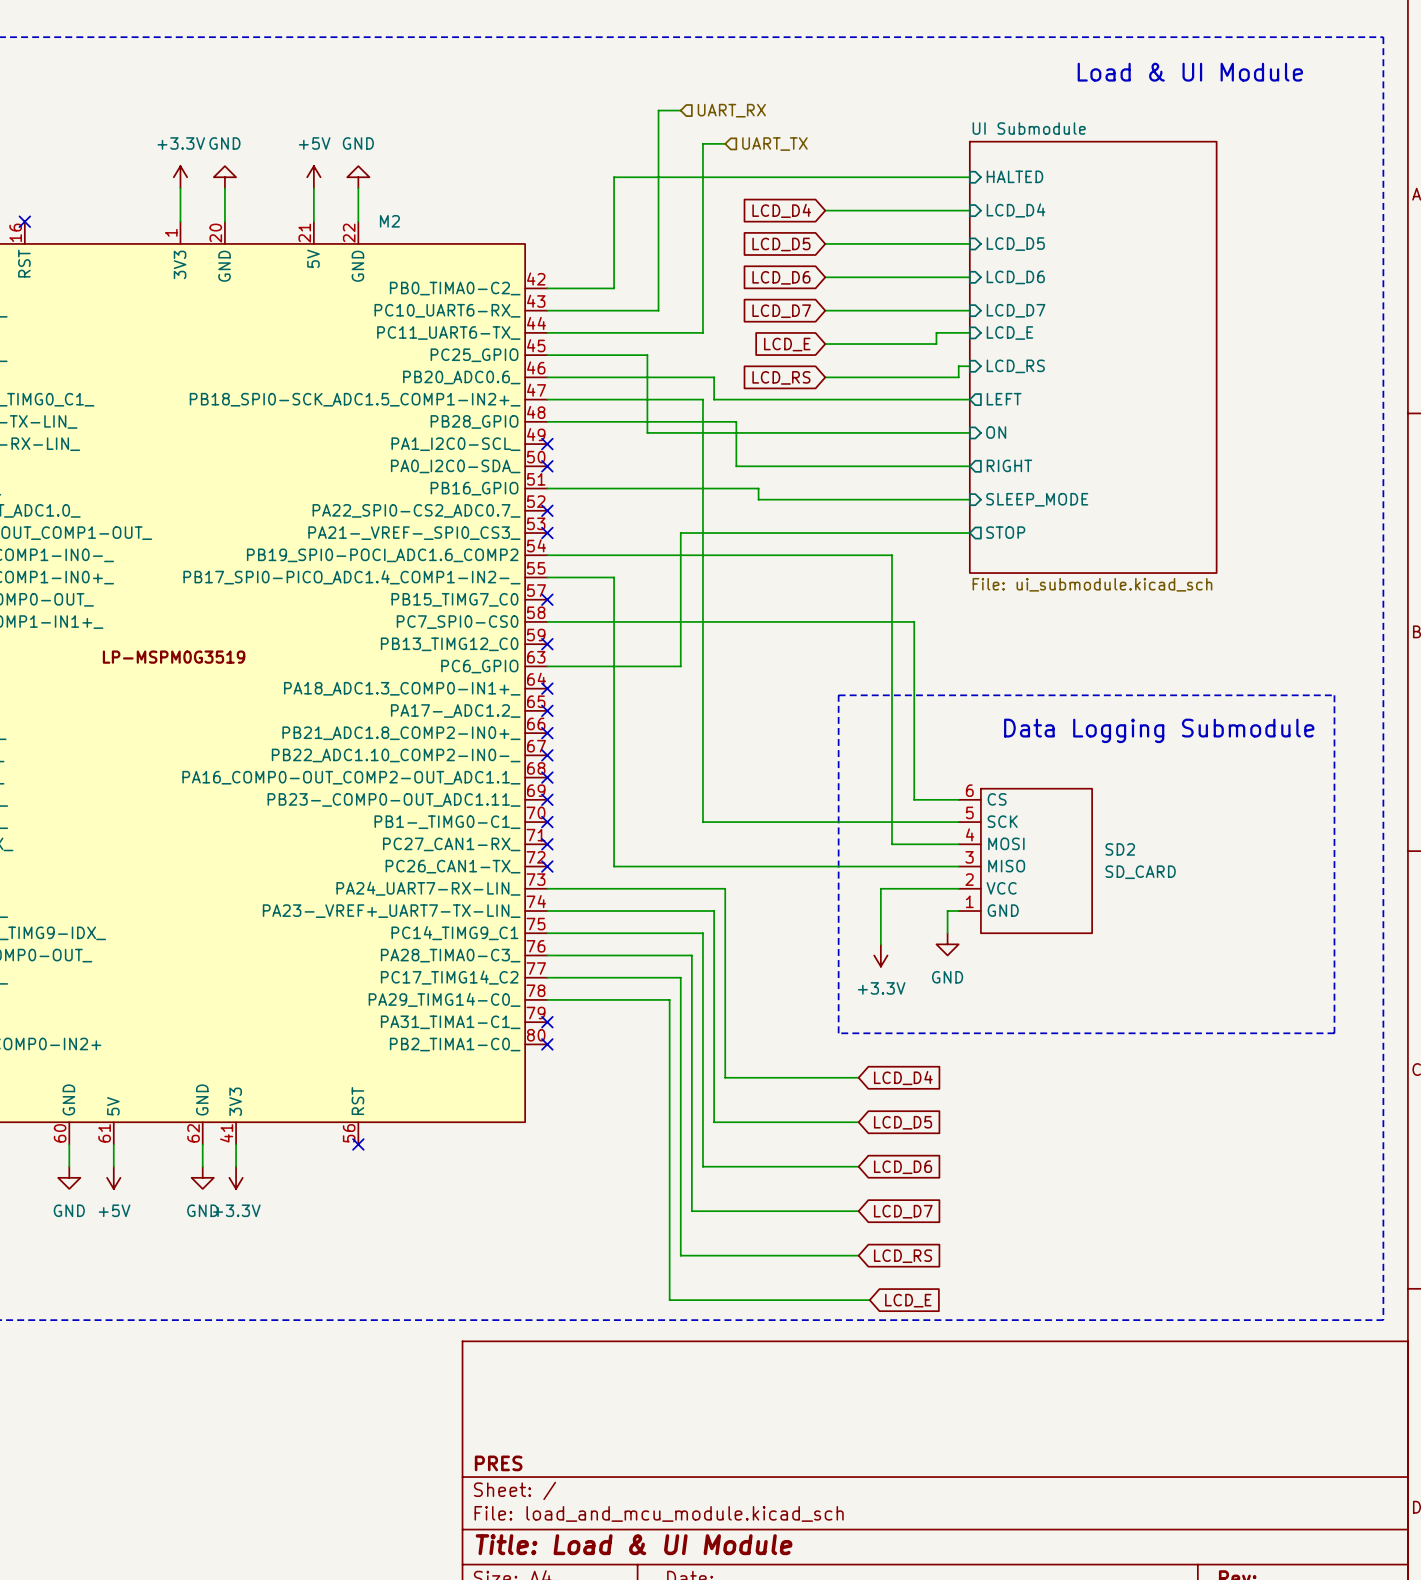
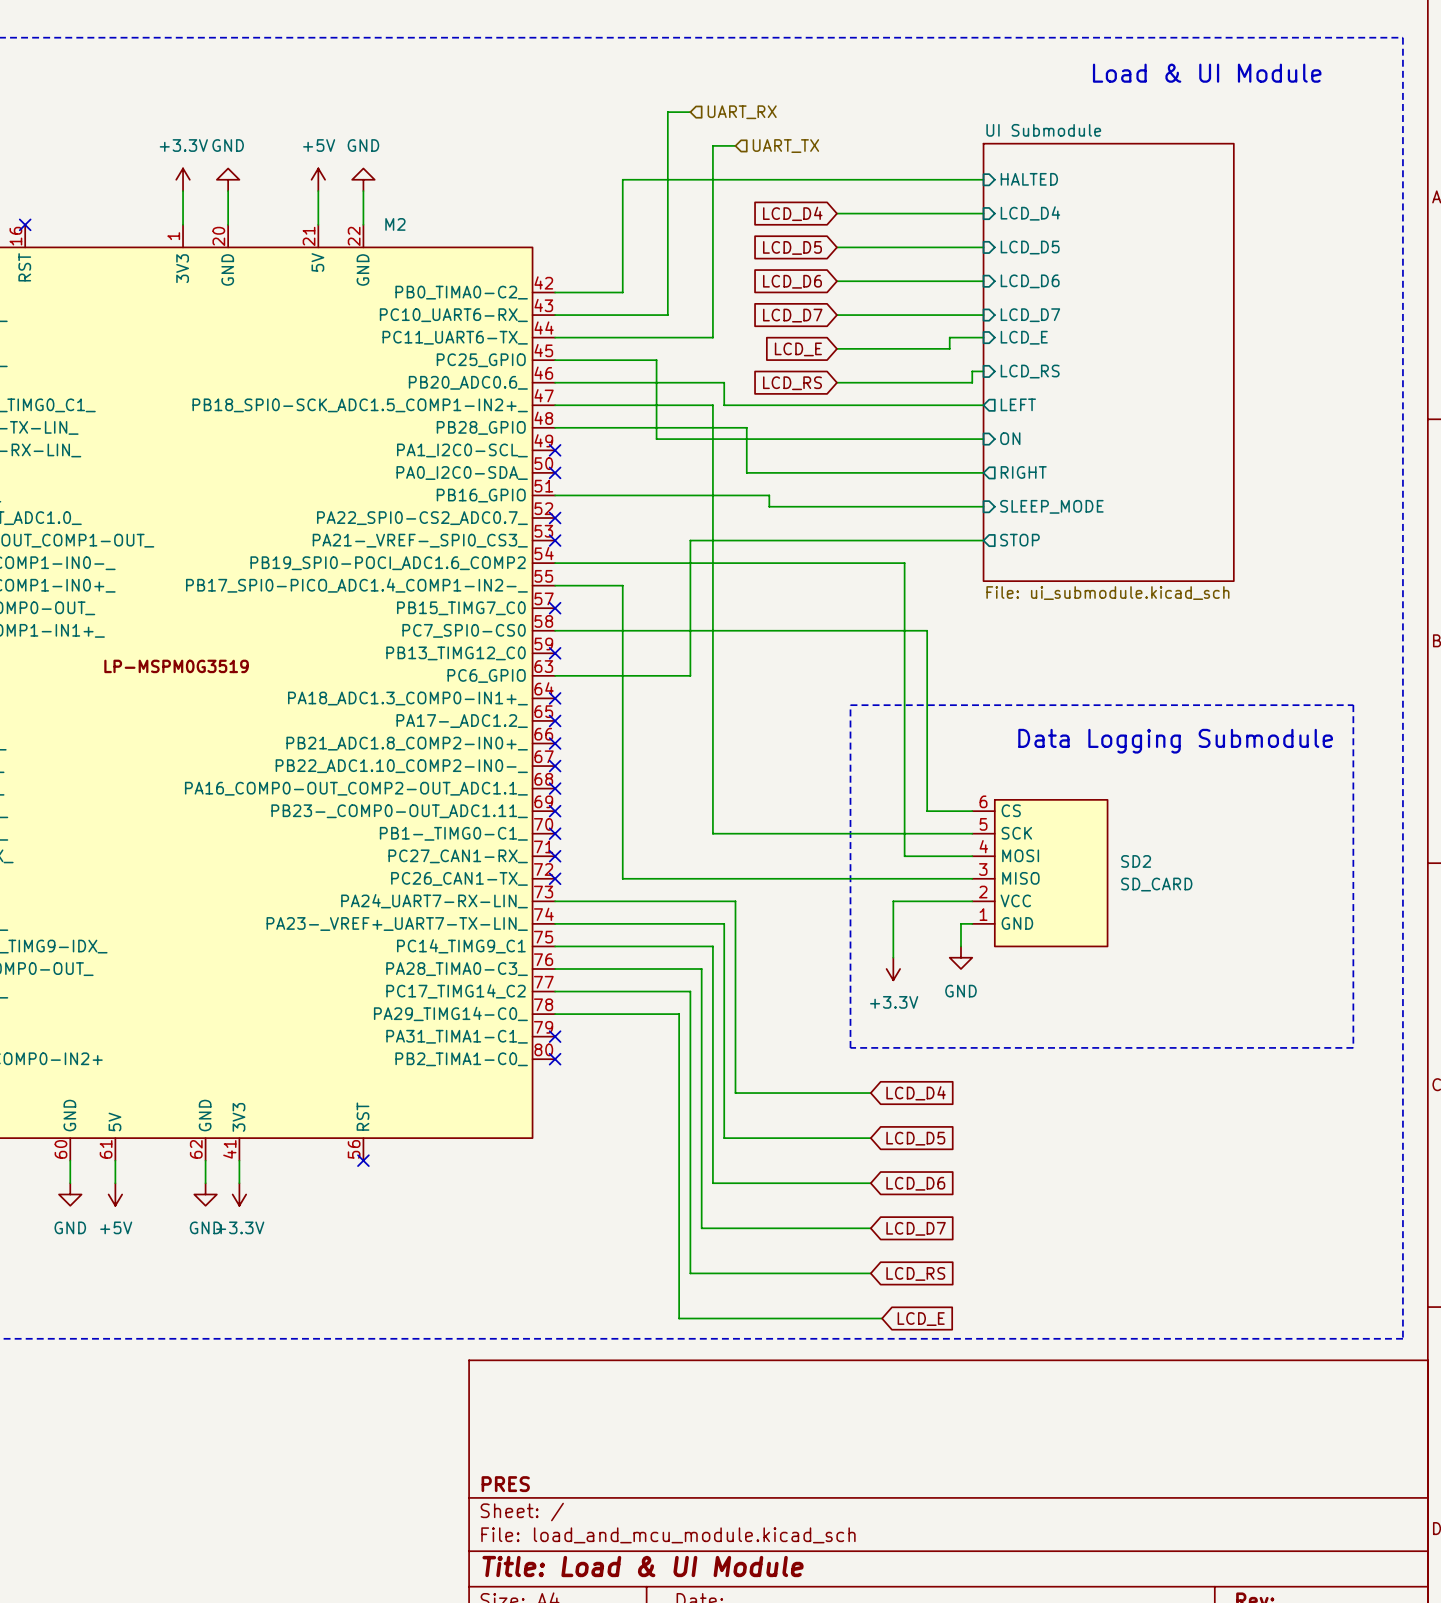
SD2 symbol: [958, 788, 1093, 934] -> [972, 799, 1108, 947]

